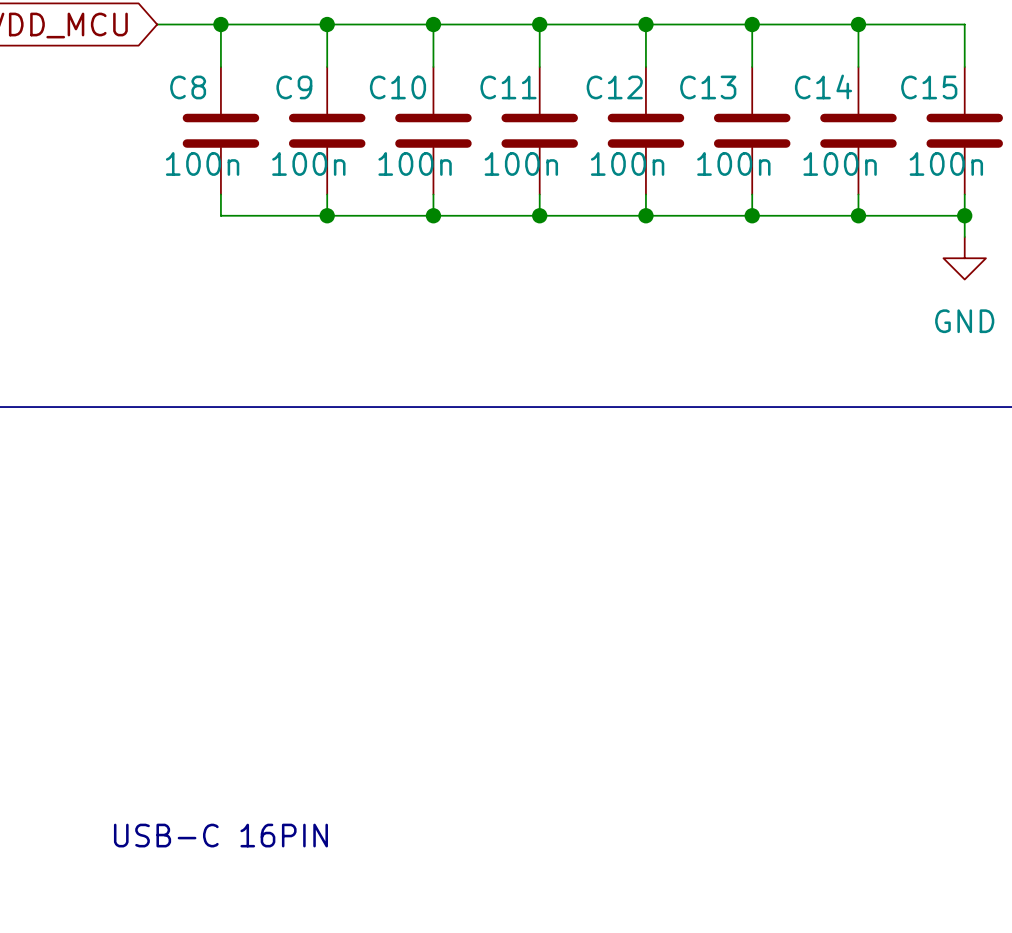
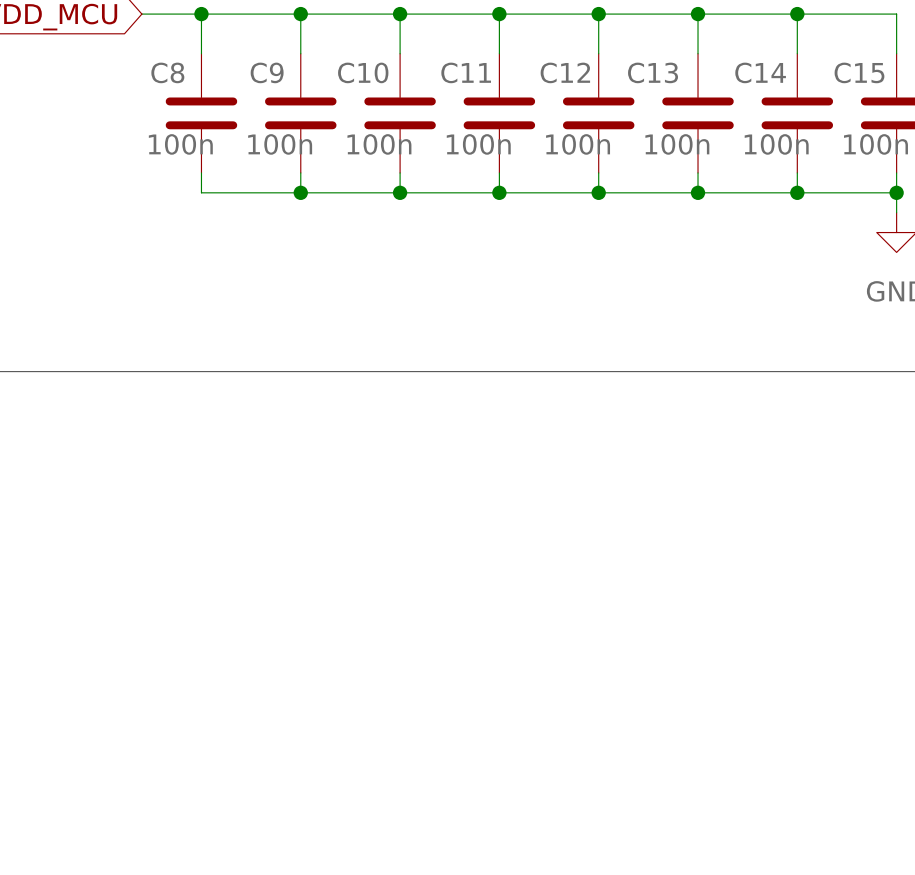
text: USB-C 16PIN (220, 835) -> none

